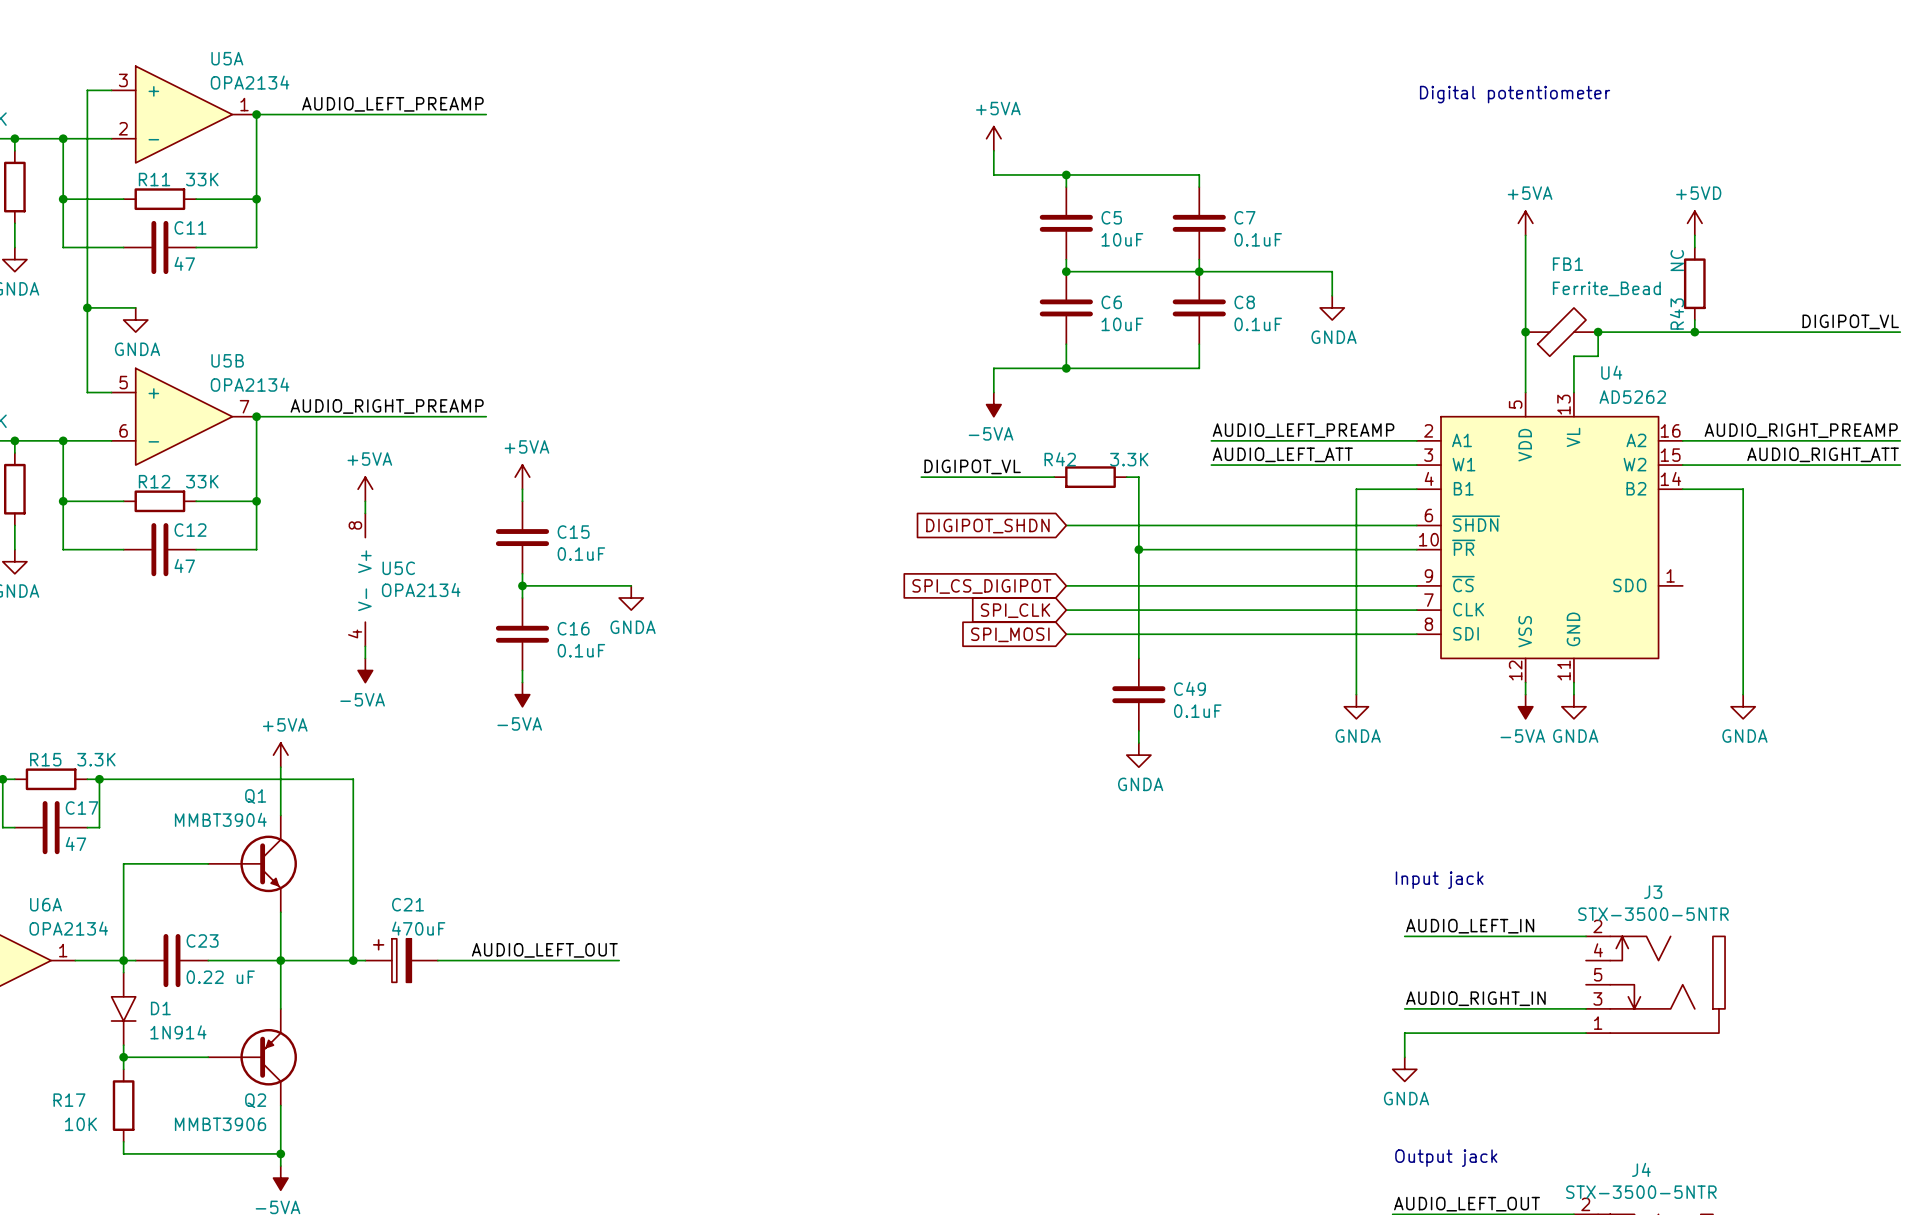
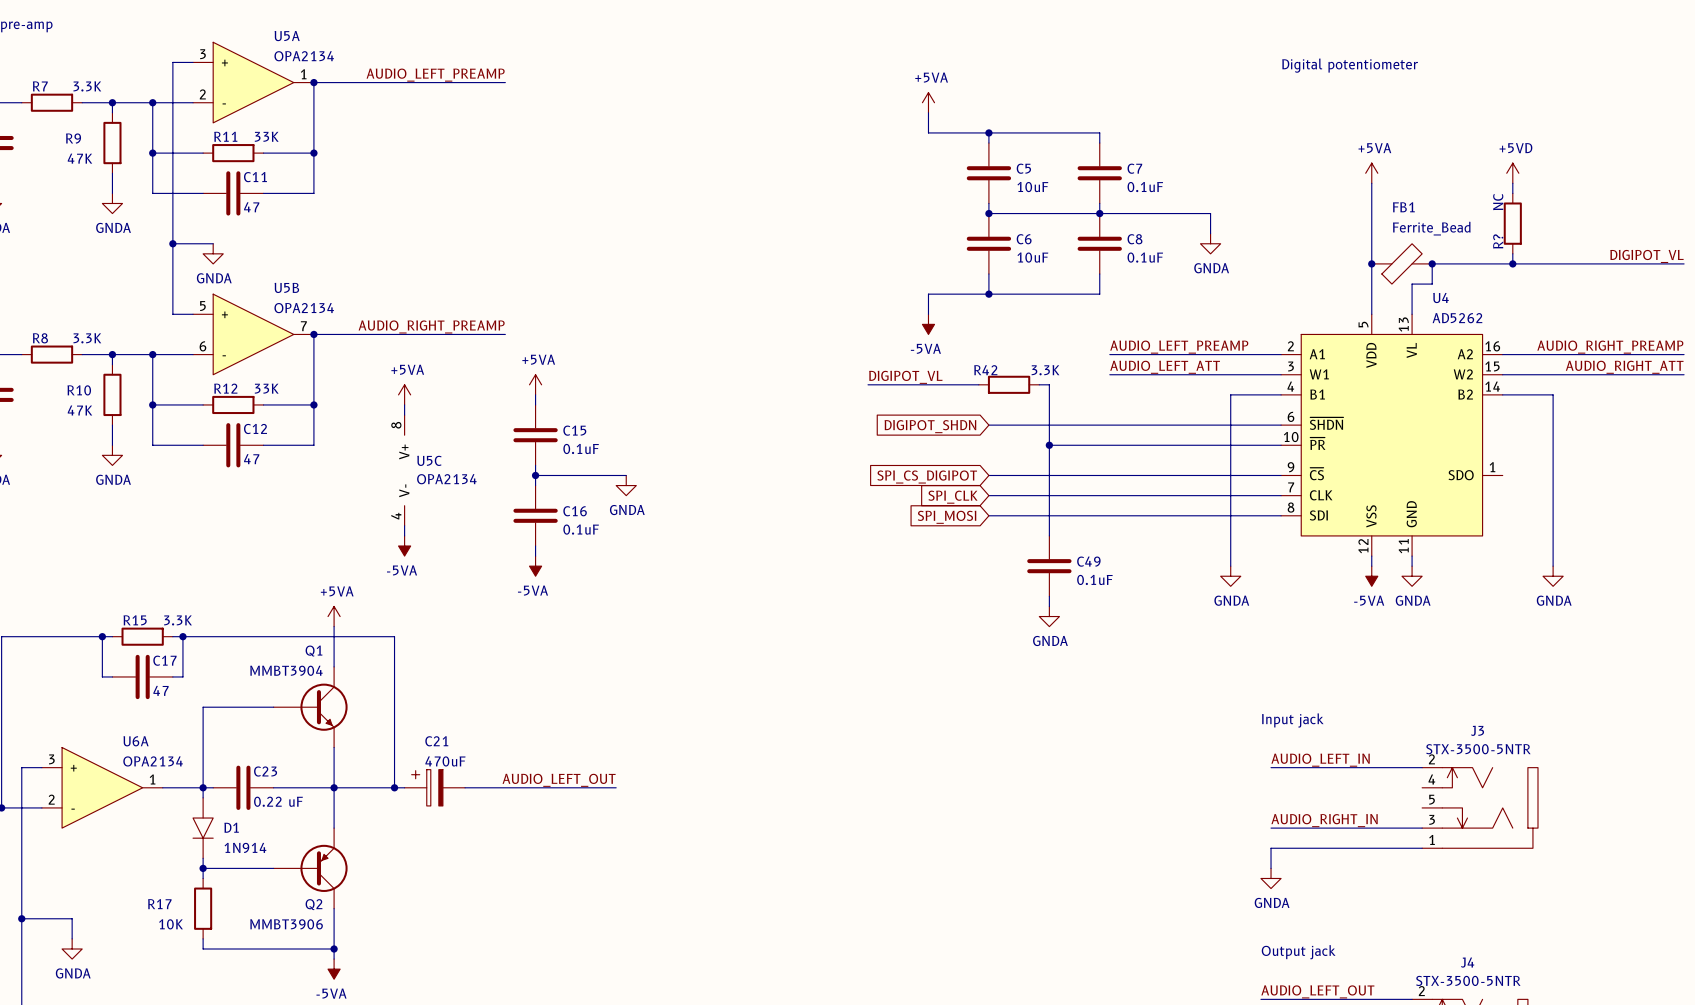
R43 name: R43 (1676, 314) -> R? (1498, 241)

